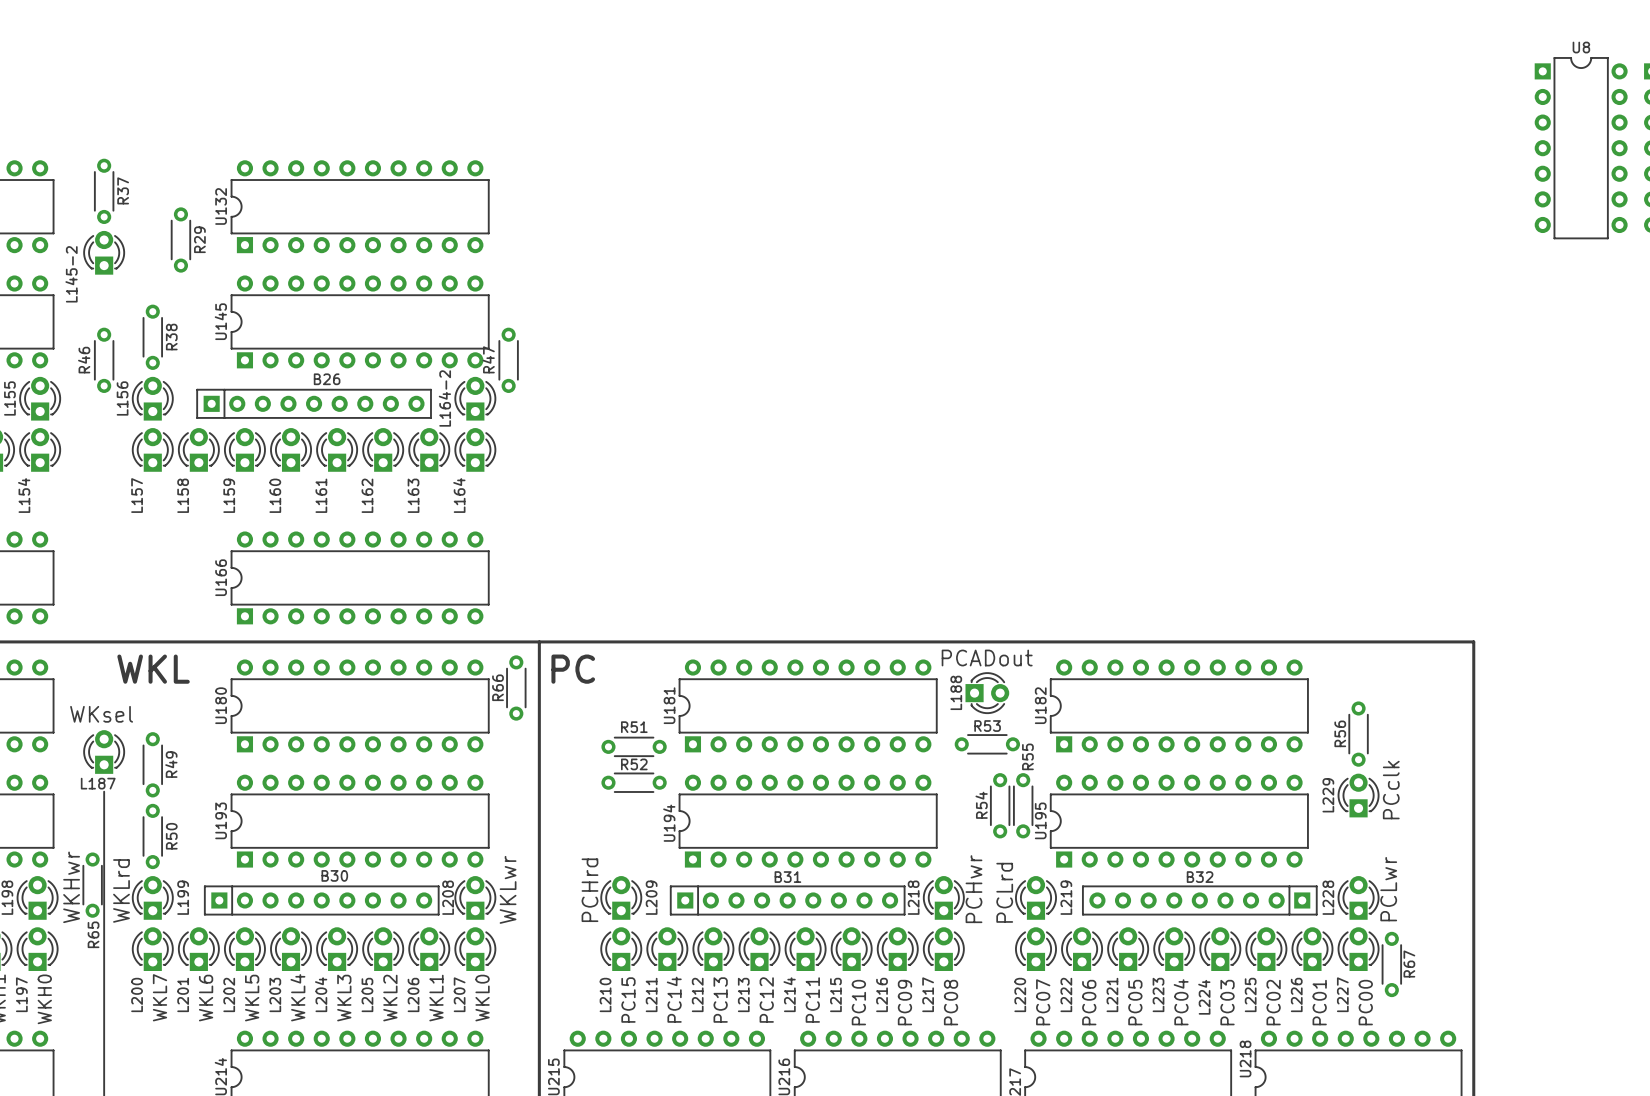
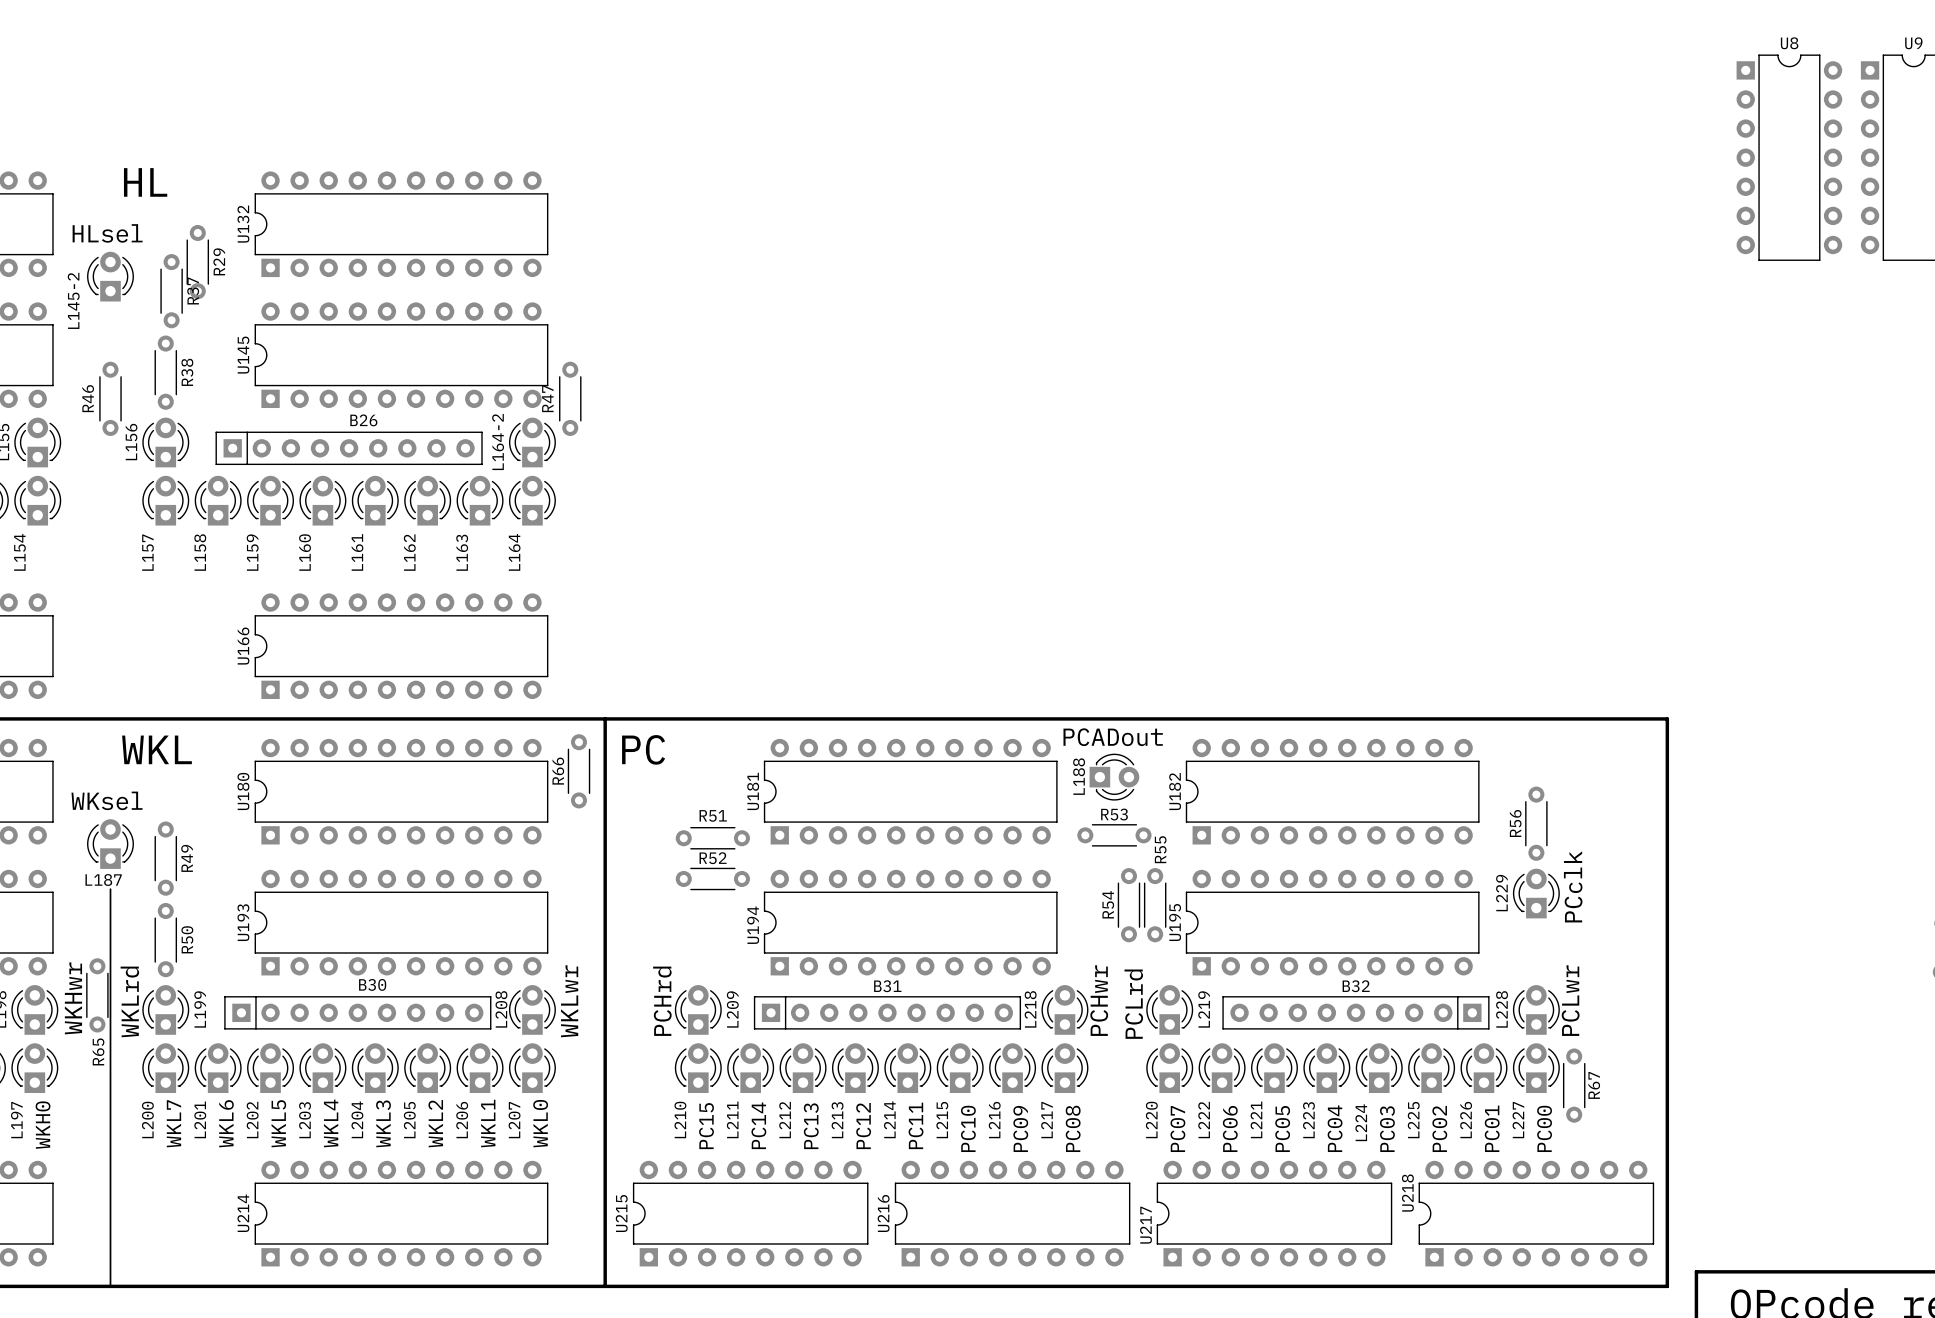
text: none -> HL (145, 182)
R37 position: (104, 191) -> (171, 291)
text: none -> HLsel (107, 233)

